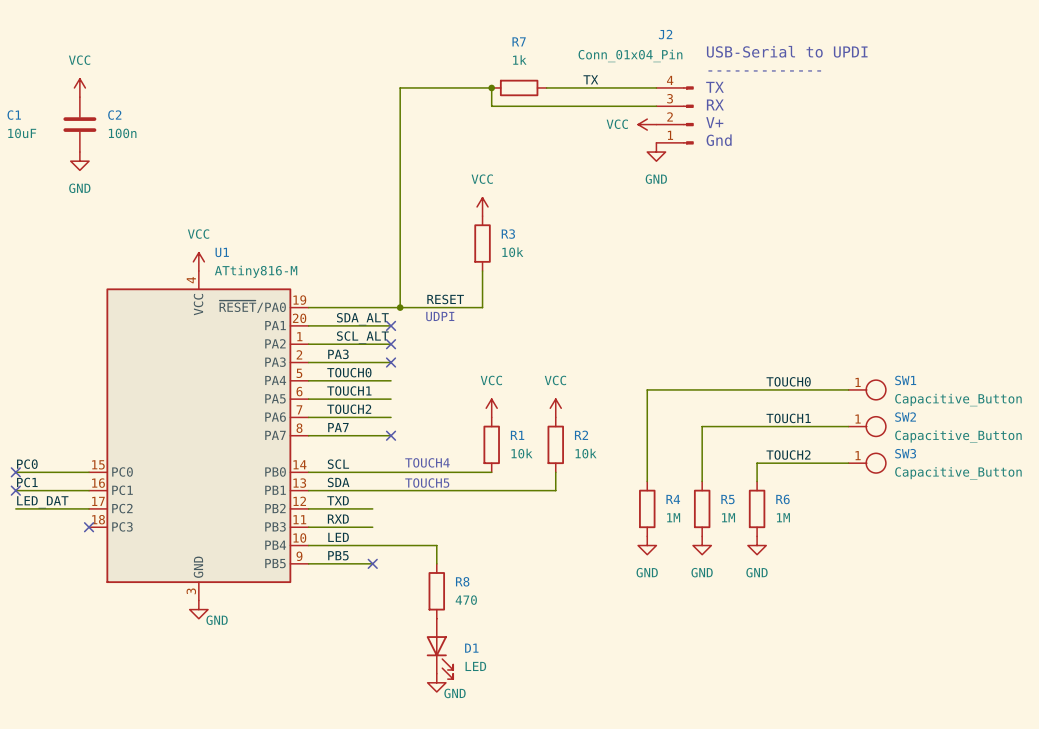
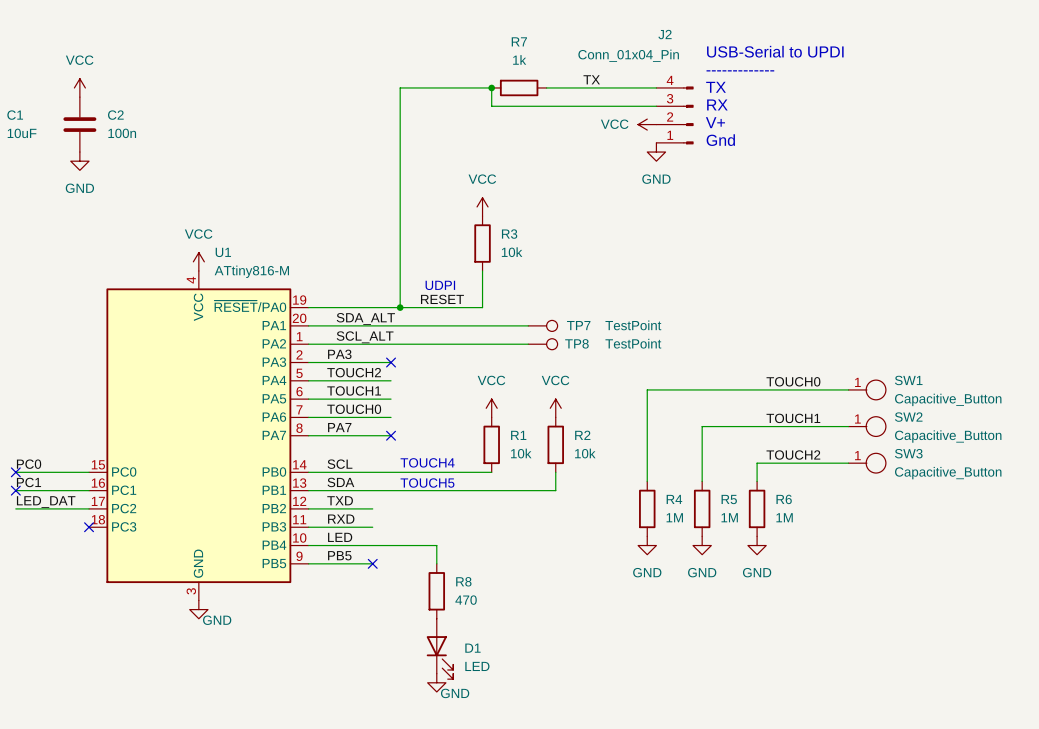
text position: UDPI (440, 316) -> UDPI (440, 285)
wire: none -> (391, 325) (528, 325)
no-connect mark: (391, 325) -> none
TP7: none -> TestPoint (542, 325)
wire: none -> (391, 344) (528, 344)
no-connect mark: (391, 344) -> none
TP8: none -> TestPoint (542, 344)
label: TOUCH0 (349, 372) -> TOUCH2 (354, 372)
label: TOUCH2 (349, 409) -> TOUCH0 (354, 409)

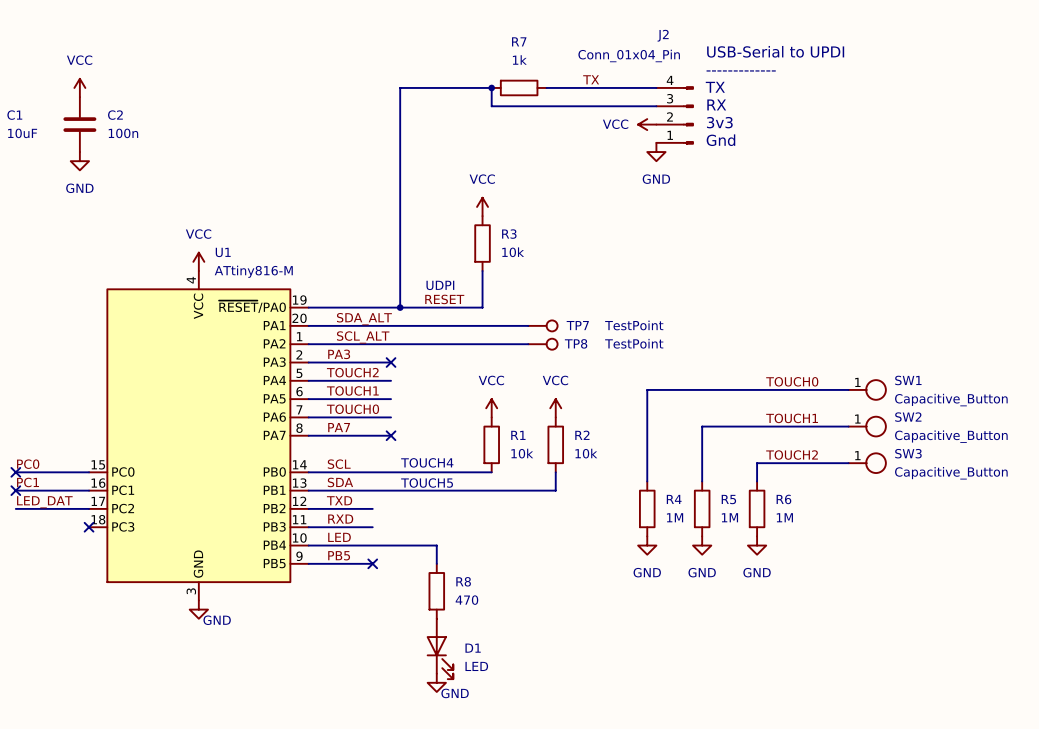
text: V+ (715, 122) -> 3v3 (719, 122)

